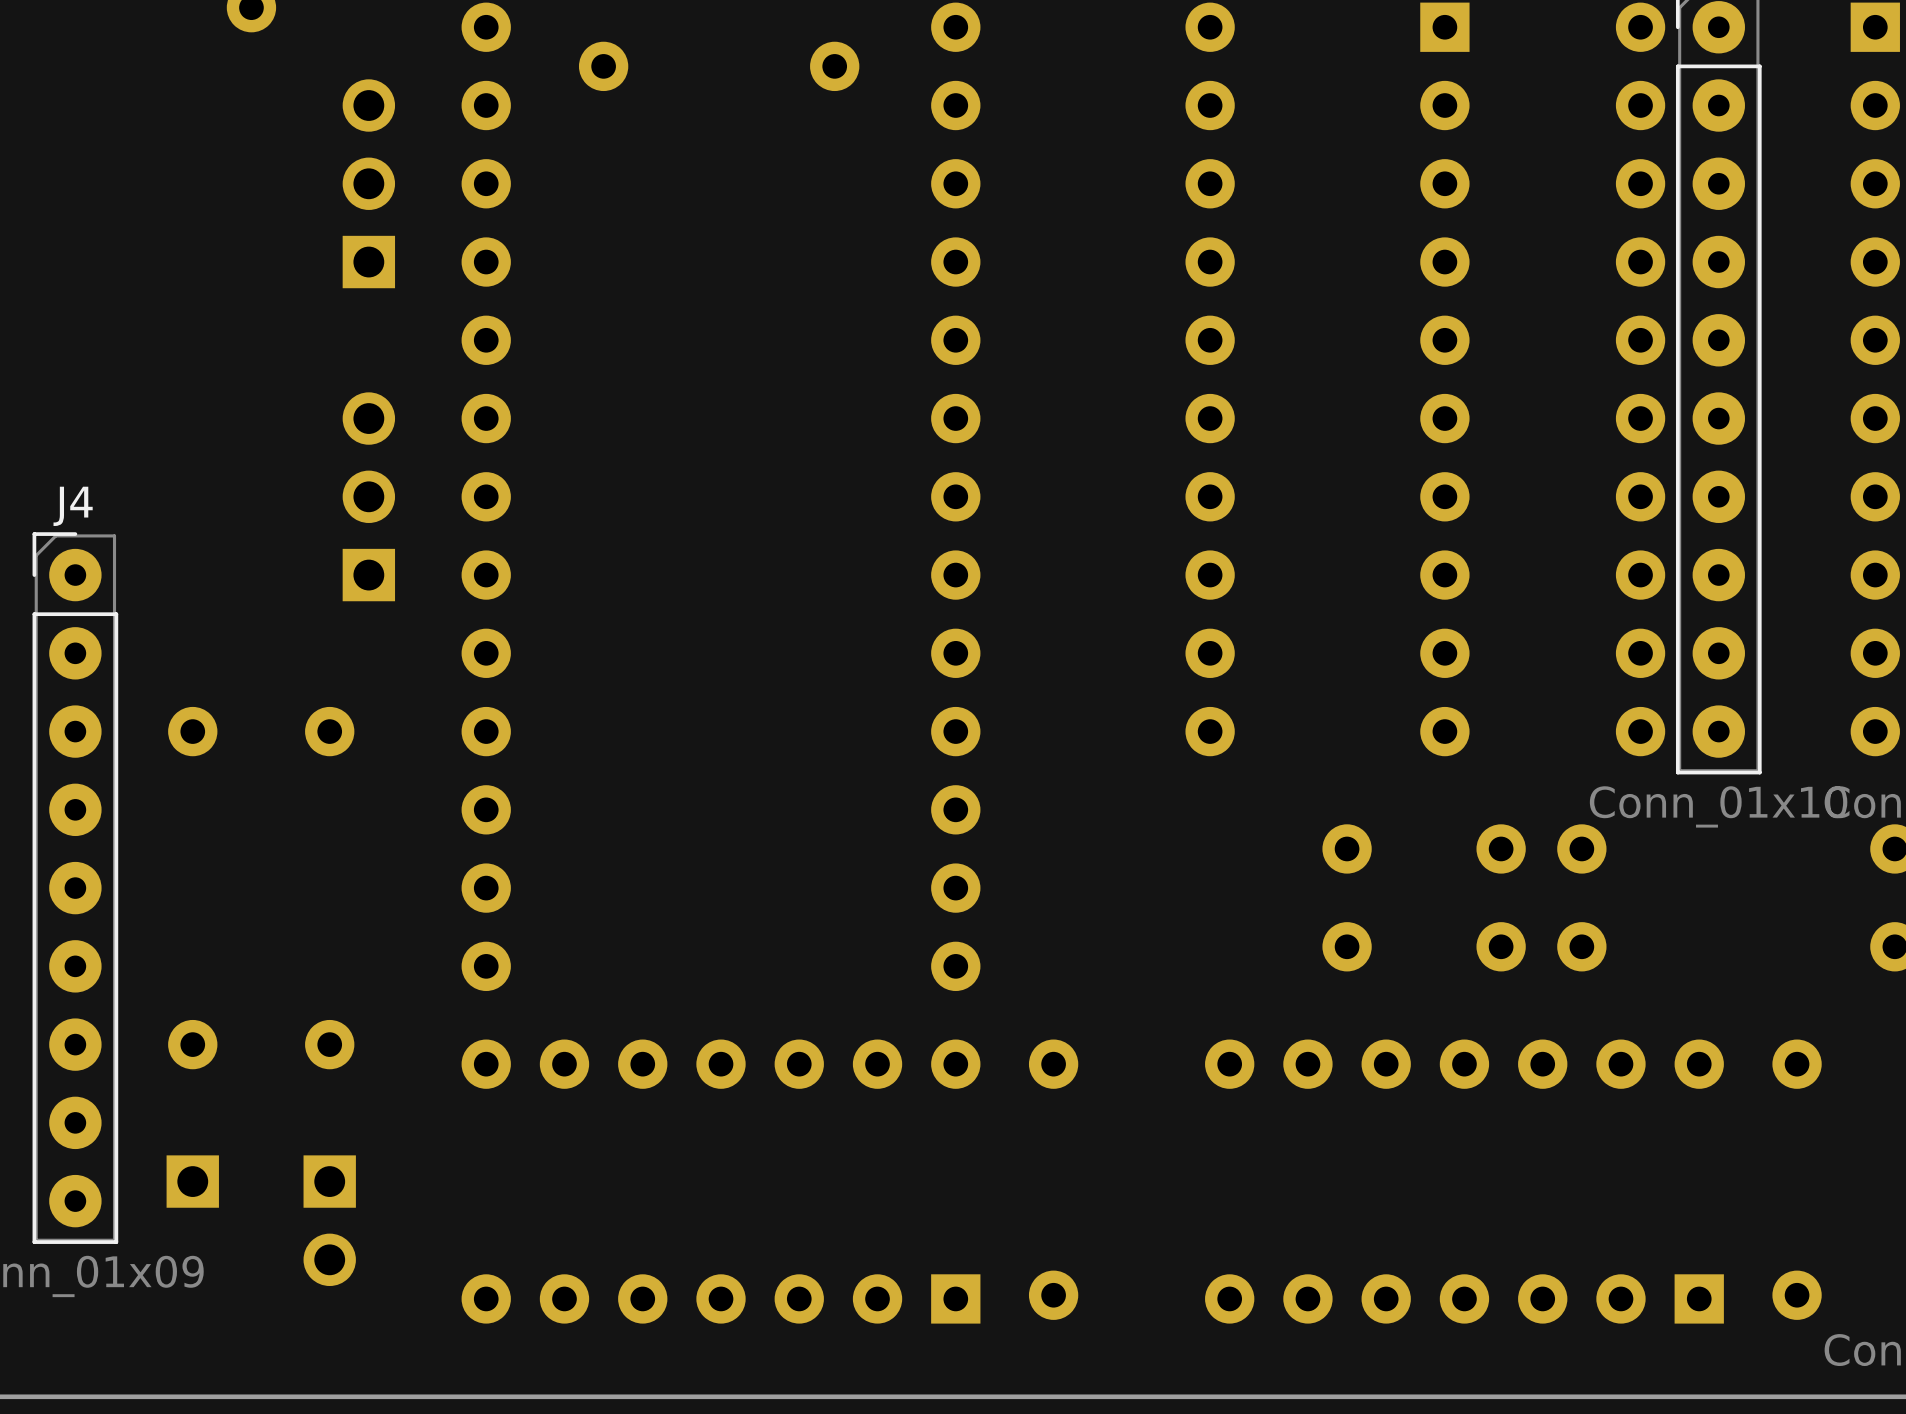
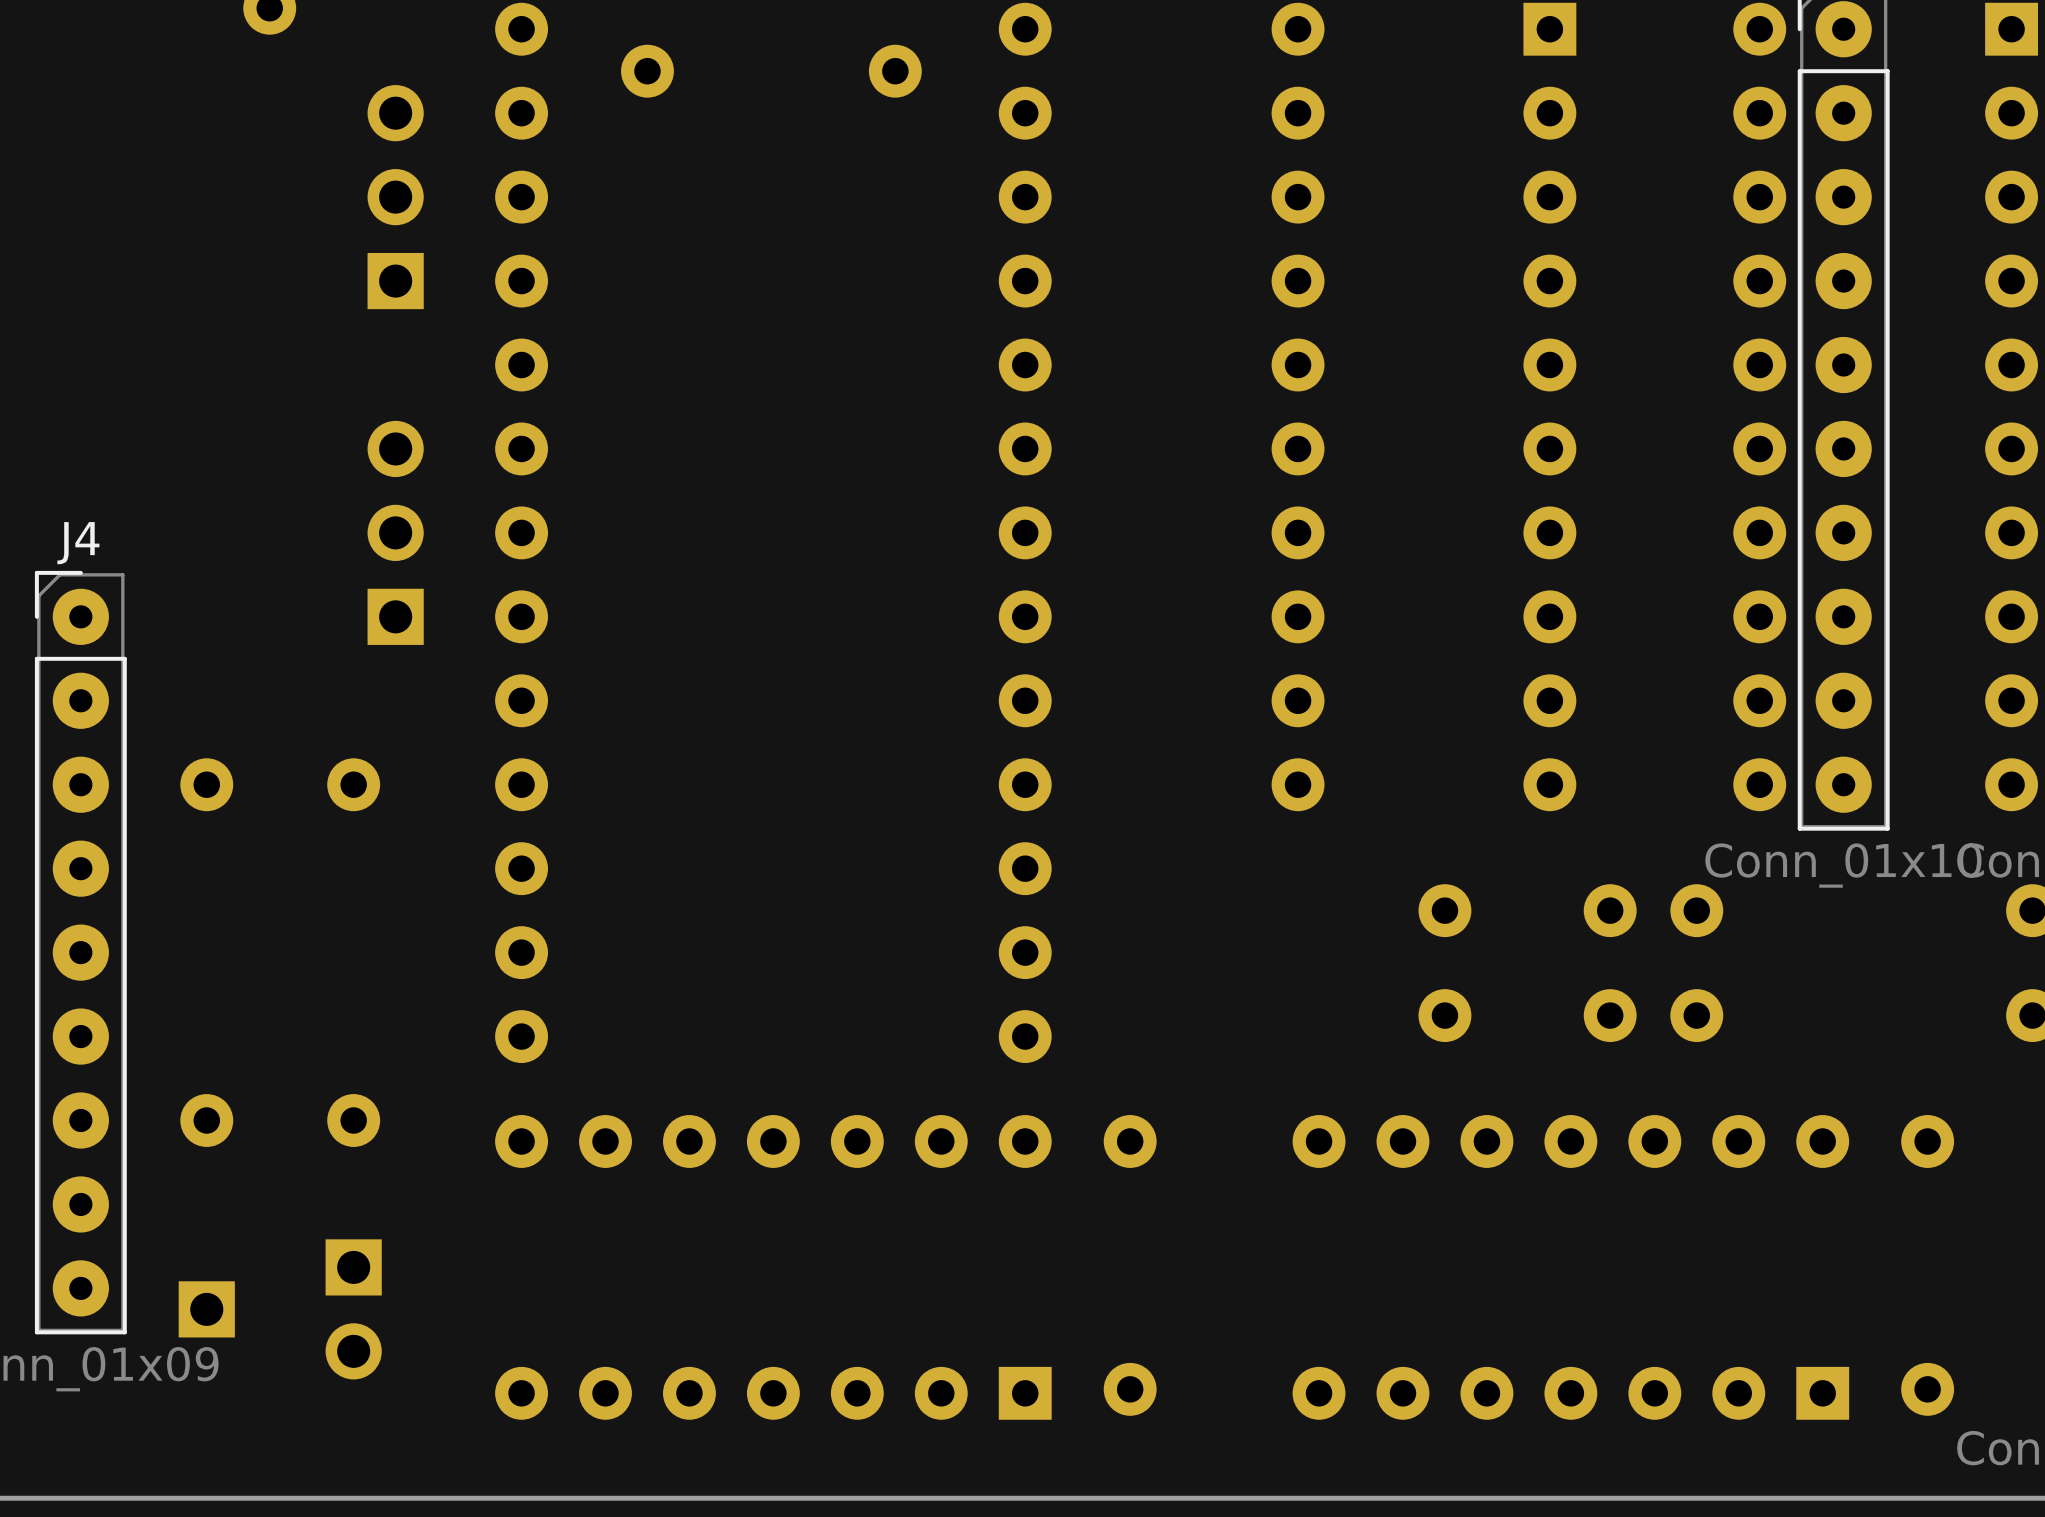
part position: (192, 1181) -> (206, 1309)

